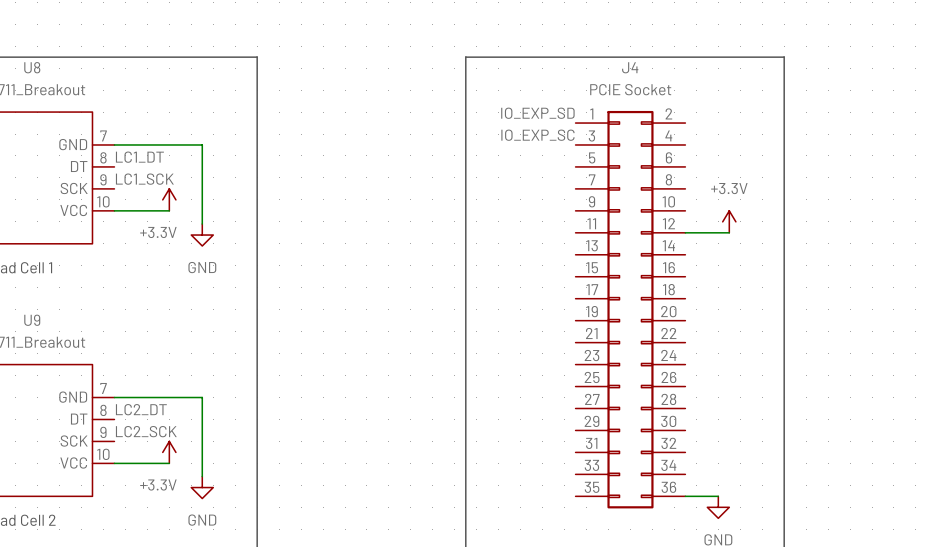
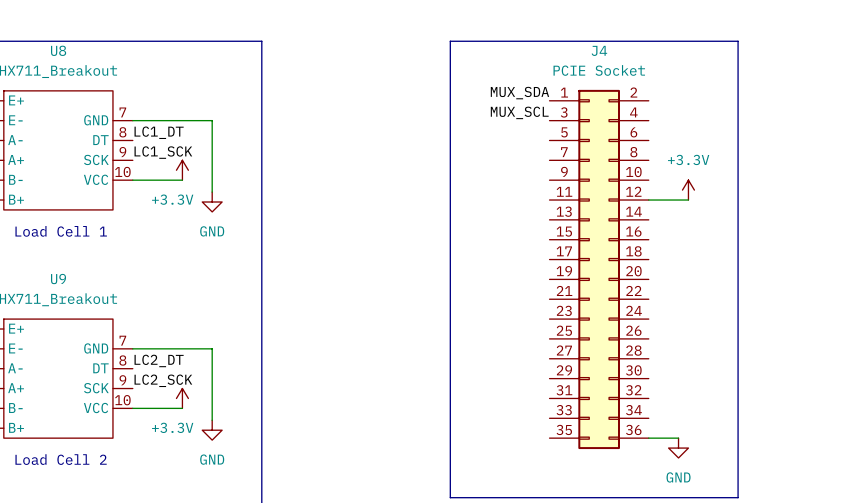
label: IO_EXP_SD (537, 113) -> MUX_SDA (519, 93)
label: IO_EXP_SC (537, 135) -> MUX_SCL (519, 112)

